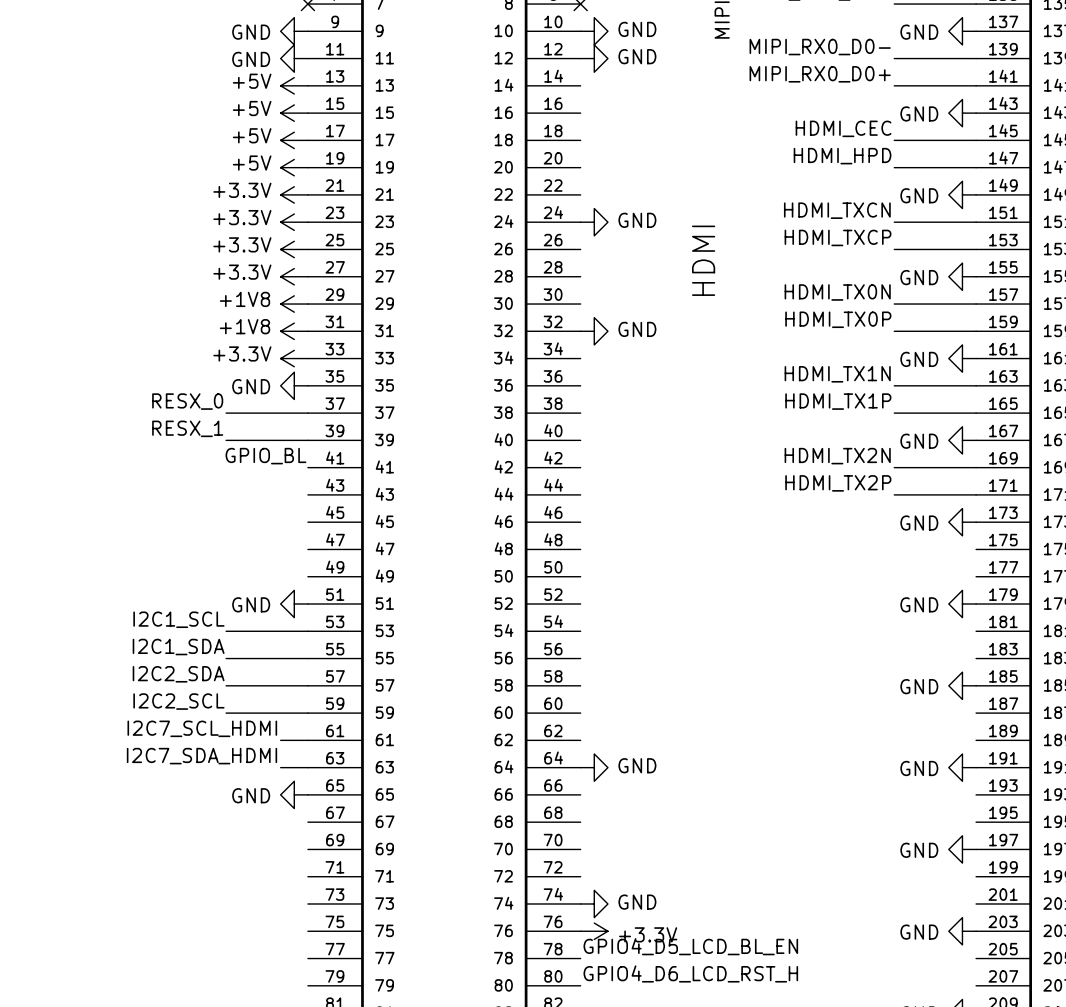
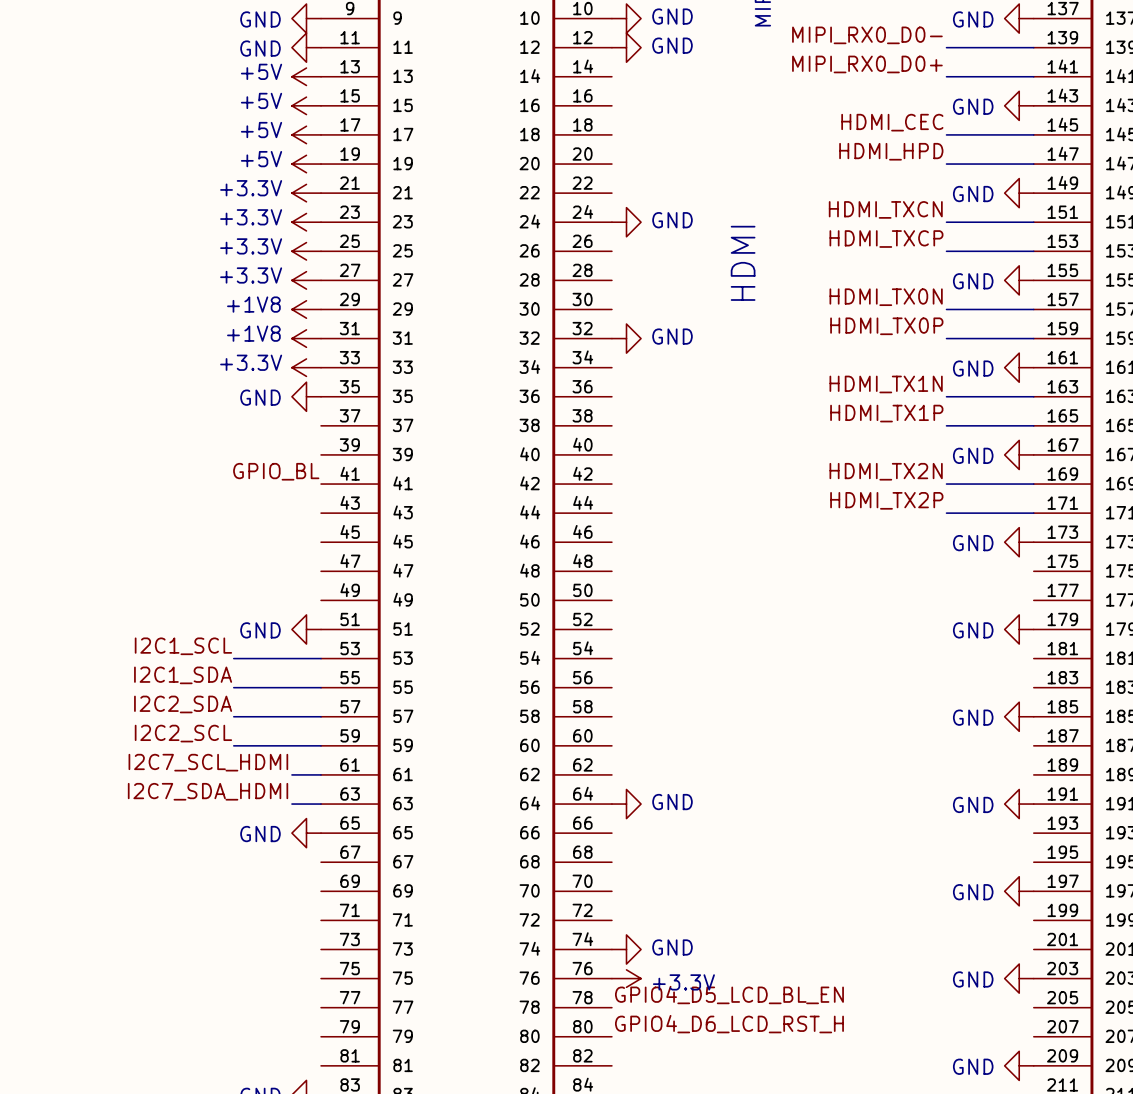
label: RESX_0 (187, 401) -> none
wire: (226, 413) (307, 413) -> none
label: RESX_1 (187, 428) -> none
wire: (226, 440) (307, 440) -> none

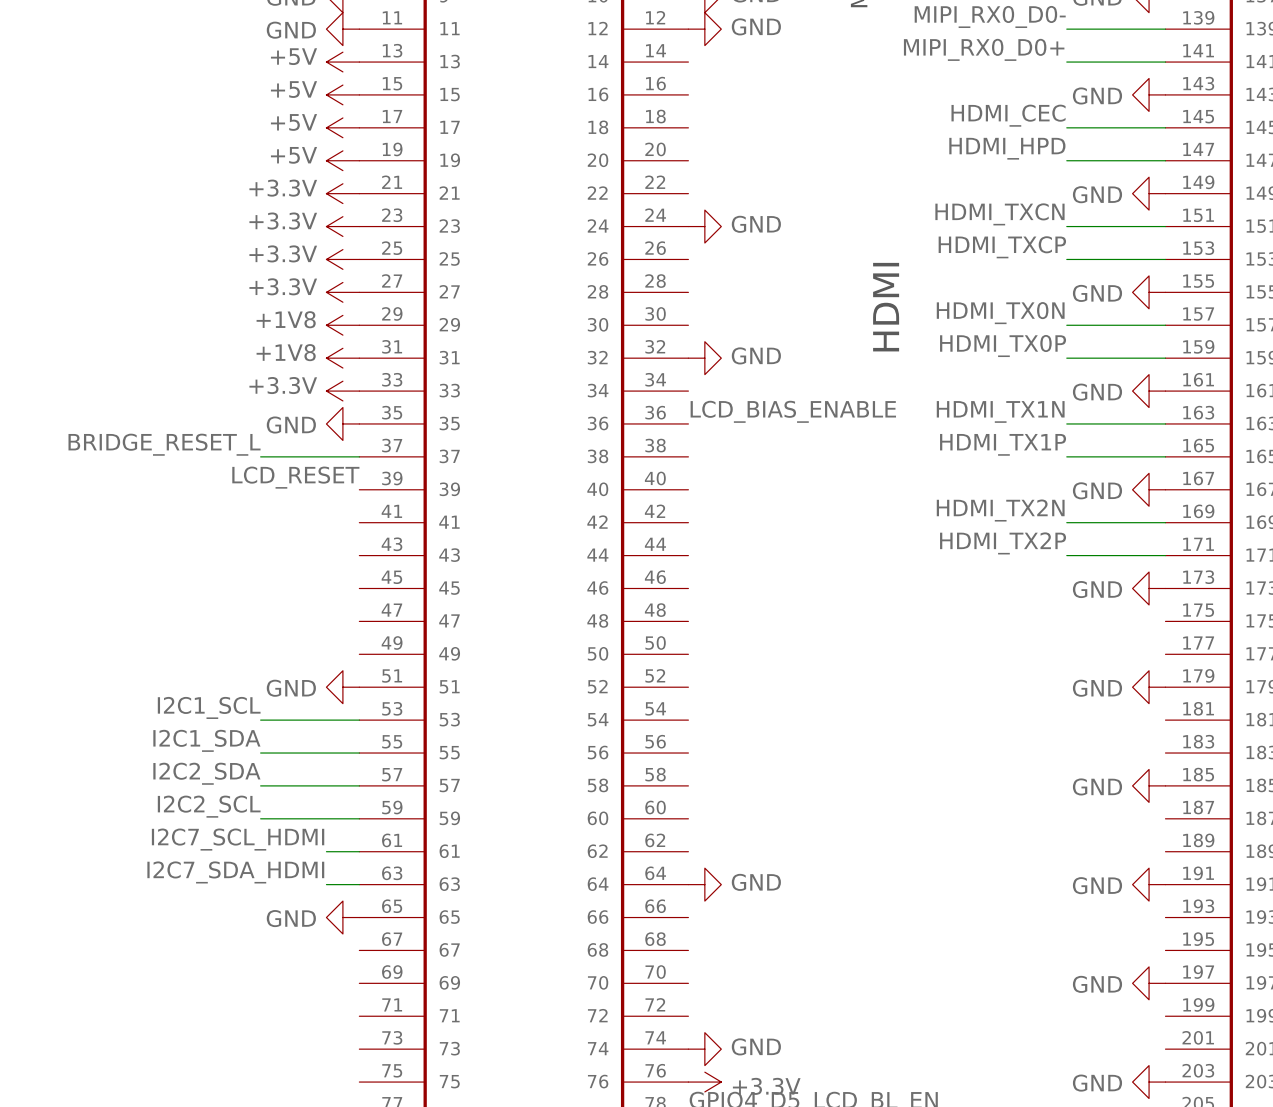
text position: HDMI (743, 263) -> HDMI (886, 307)
label: none -> LCD_BIAS_ENABLE (793, 411)
label: none -> BRIDGE_RESET_L (164, 444)
wire: none -> (260, 456) (359, 456)
label: none -> LCD_RESET (295, 477)
label: GPIO_BL (276, 471) -> none

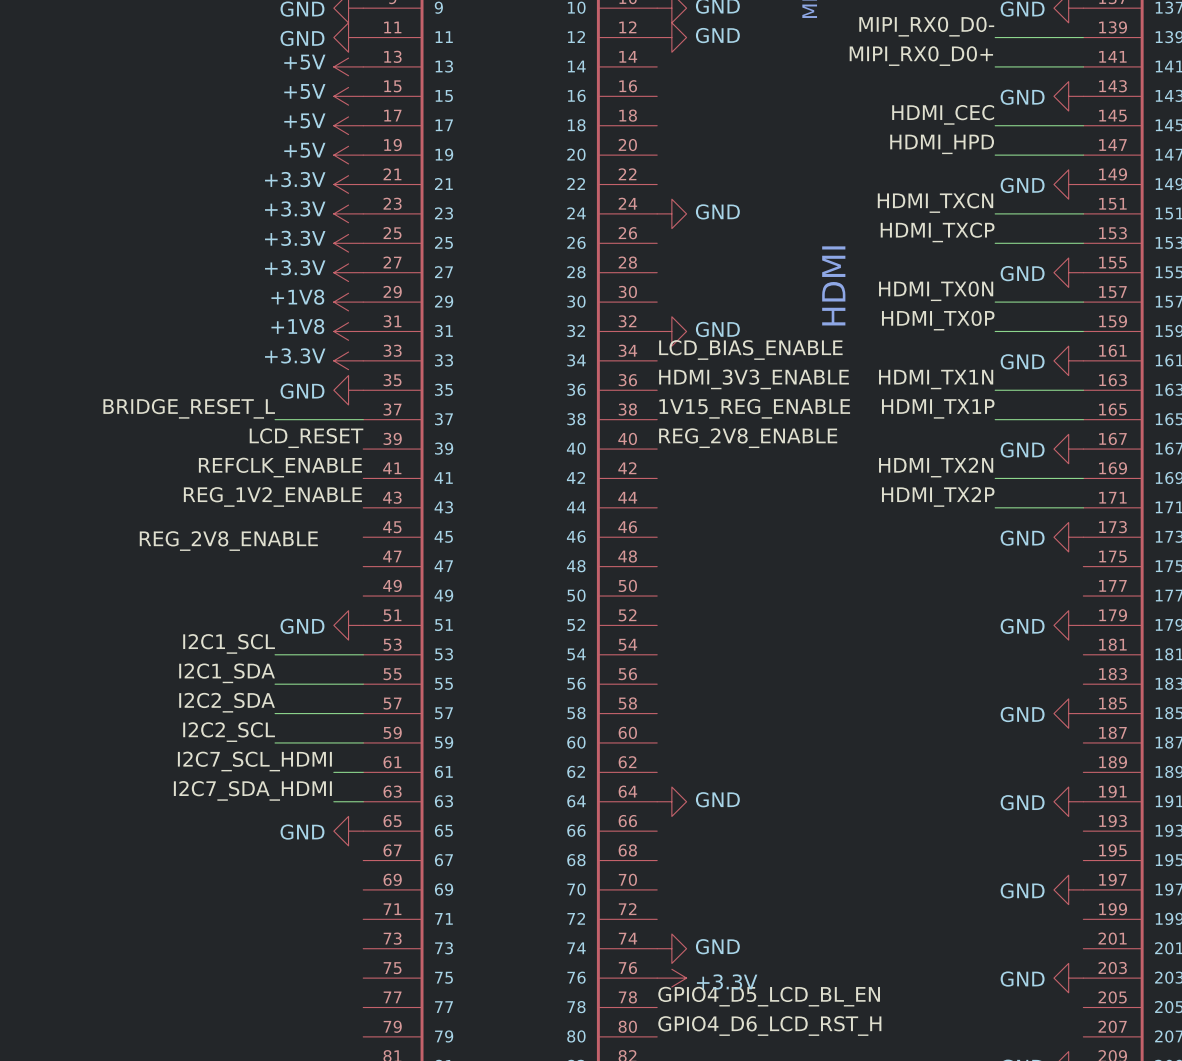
label: none -> LCD_BIAS_ENABLE (750, 350)
label: LCD_BIAS_ENABLE (793, 411) -> HDMI_3V3_ENABLE (754, 379)
label: none -> 1V15_REG_ENABLE (754, 408)
label: none -> REG_2V8_ENABLE (748, 438)
label: none -> REFCLK_ENABLE (280, 467)
label: none -> REG_1V2_ENABLE (272, 496)
label: none -> REG_2V8_ENABLE (228, 541)

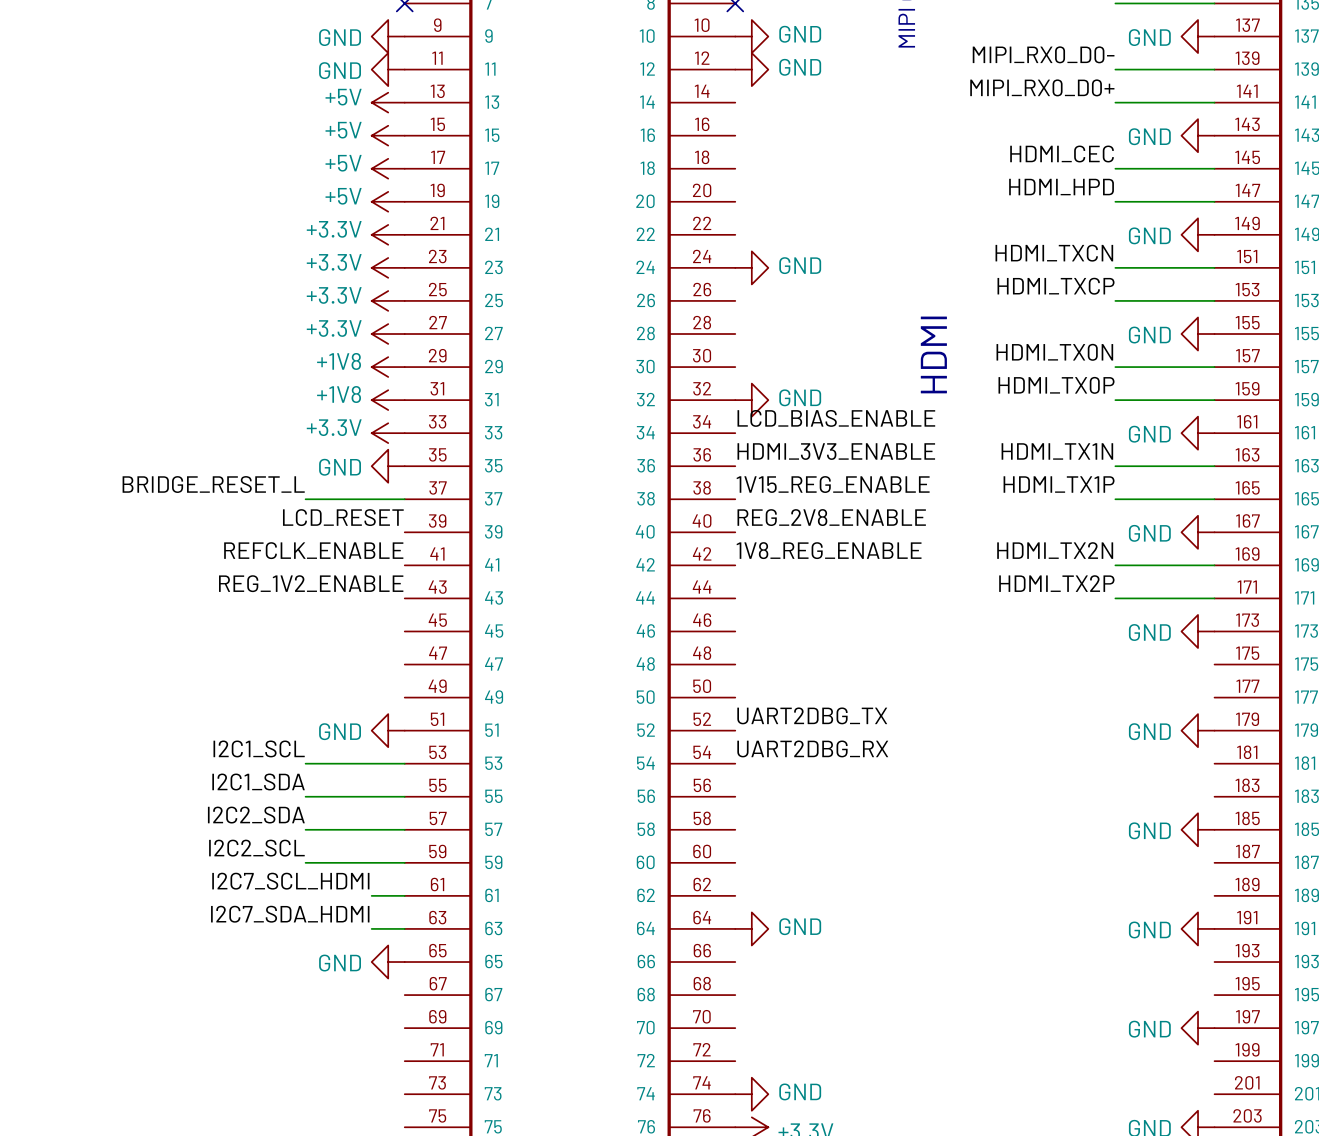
label: none -> 1V8_REG_ENABLE (829, 550)
label: REG_2V8_ENABLE (228, 541) -> none
label: none -> UART2DBG_TX (812, 715)
label: none -> UART2DBG_RX (812, 748)

